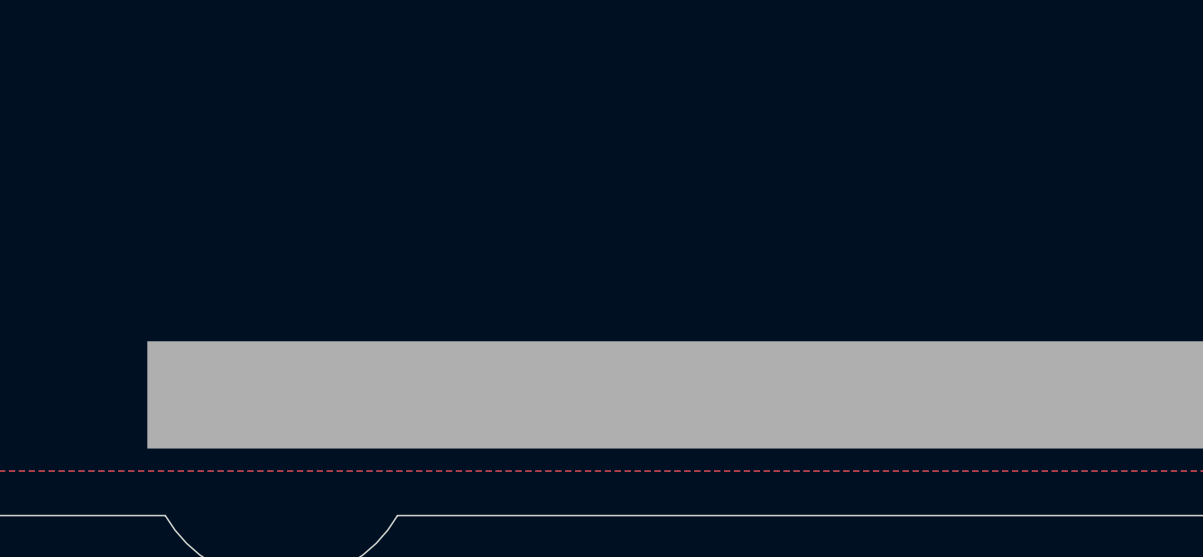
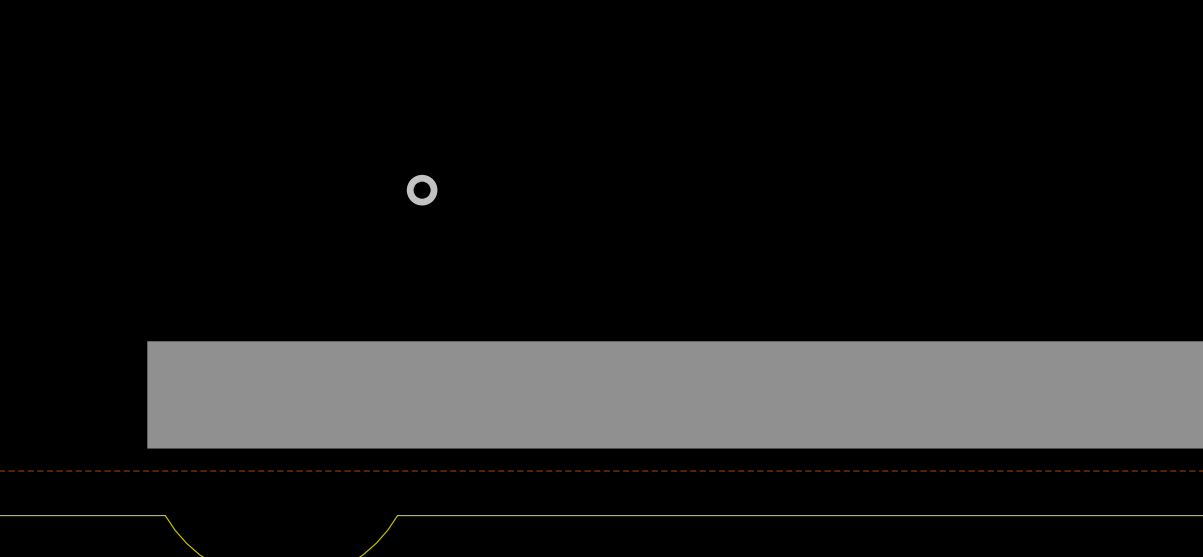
via: none -> (422, 190)

